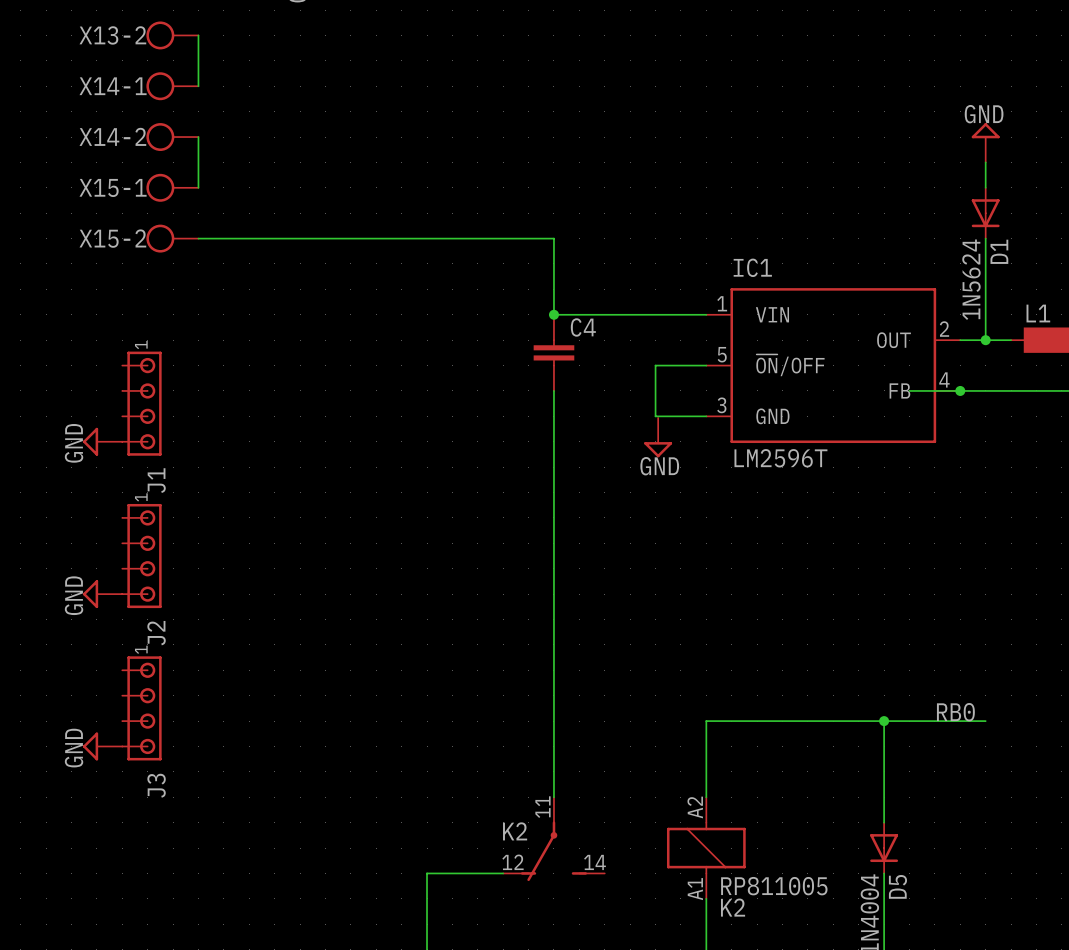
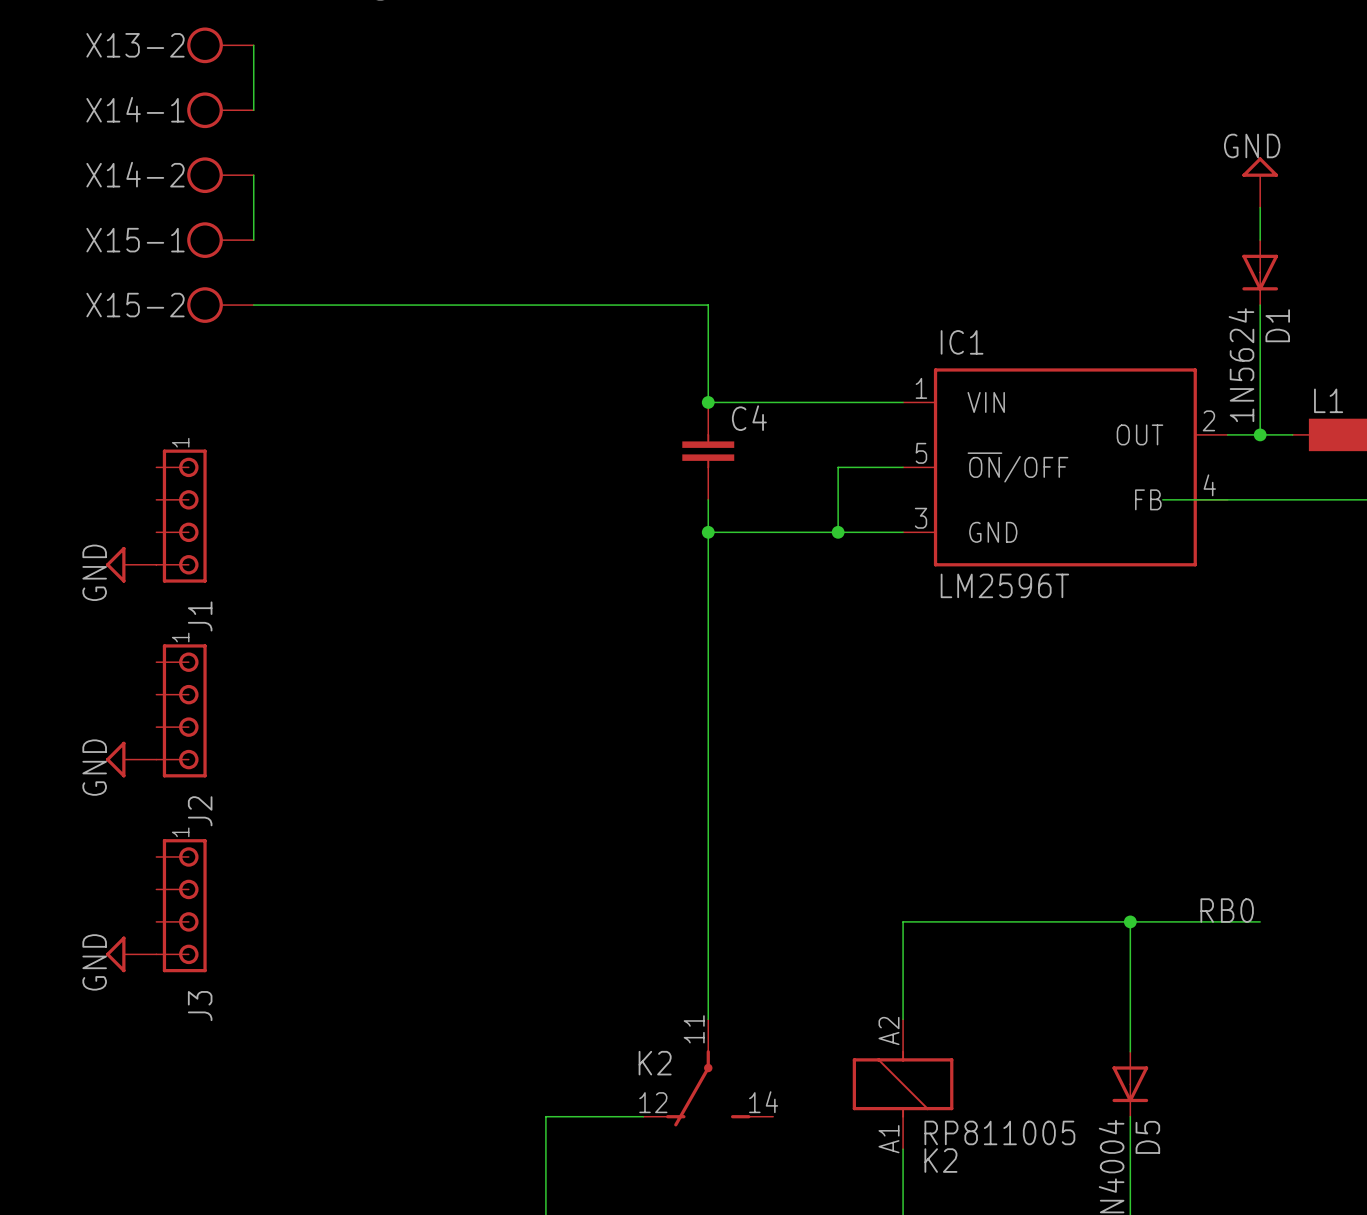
junction: (960, 390) -> none
wire: none -> (708, 532) (838, 532)
junction: none -> (708, 532)
junction: none -> (838, 532)
power symbol: GND (658, 437) -> none

